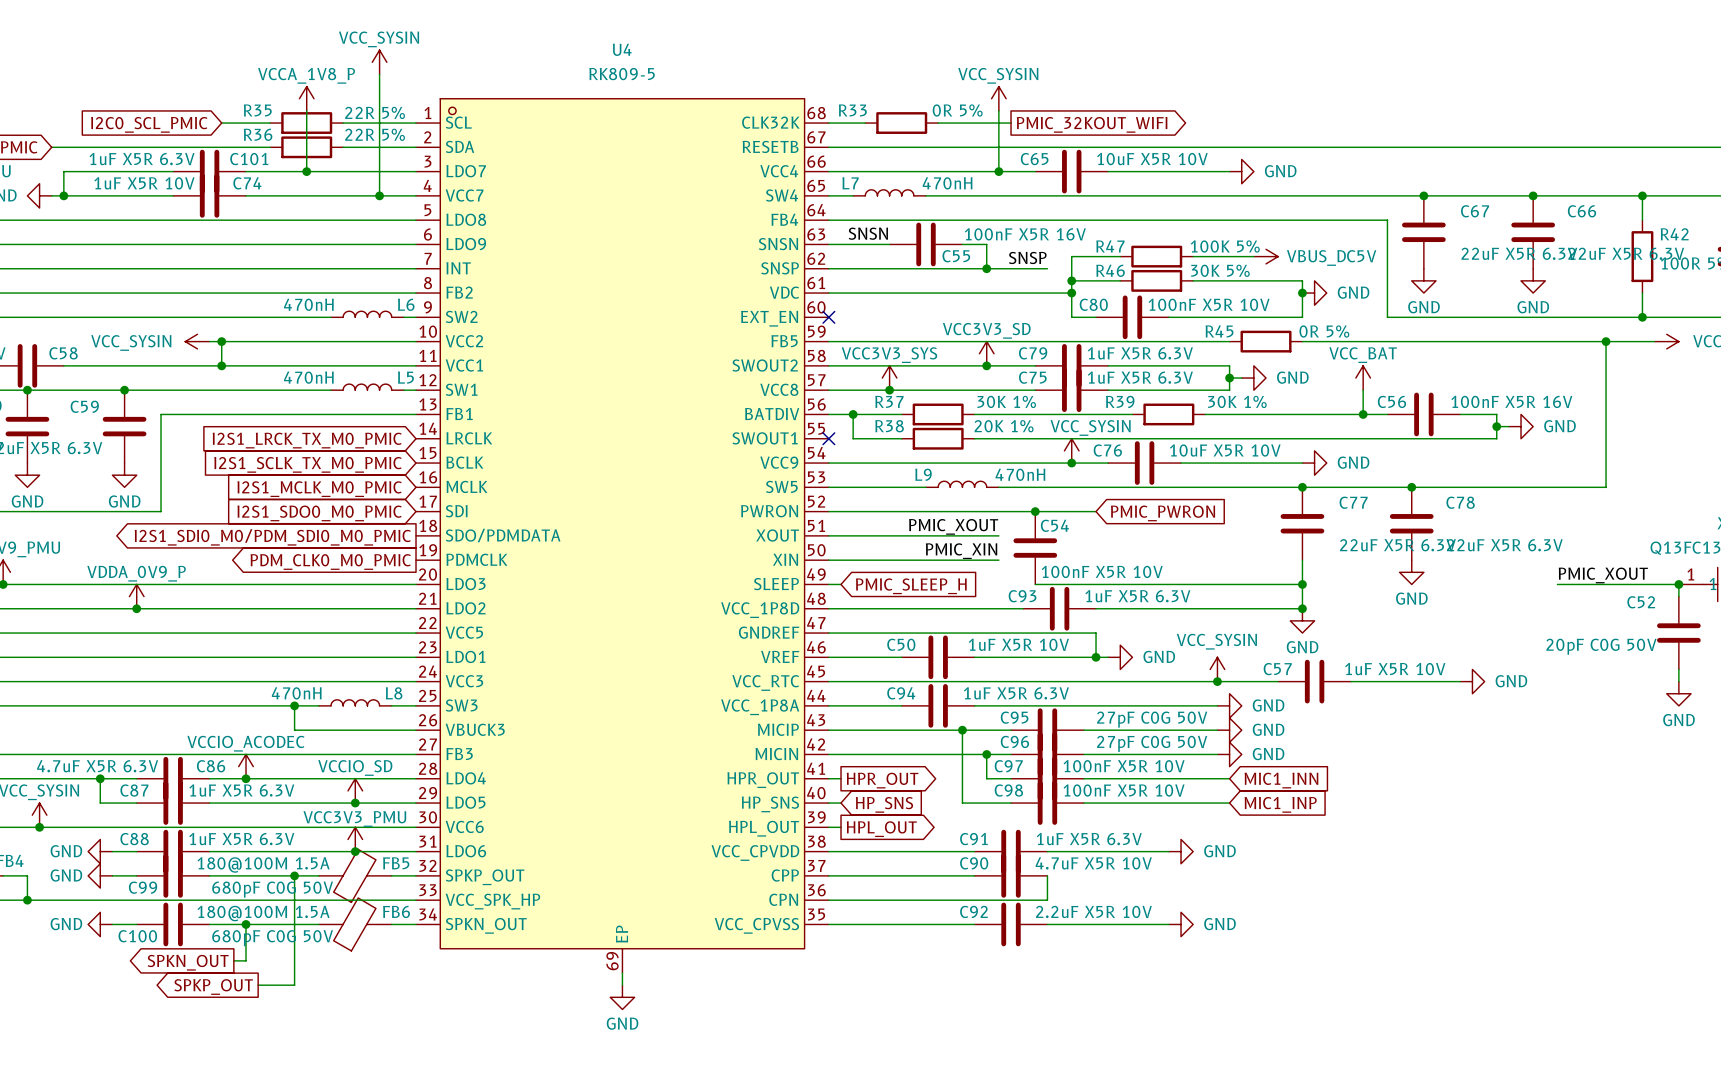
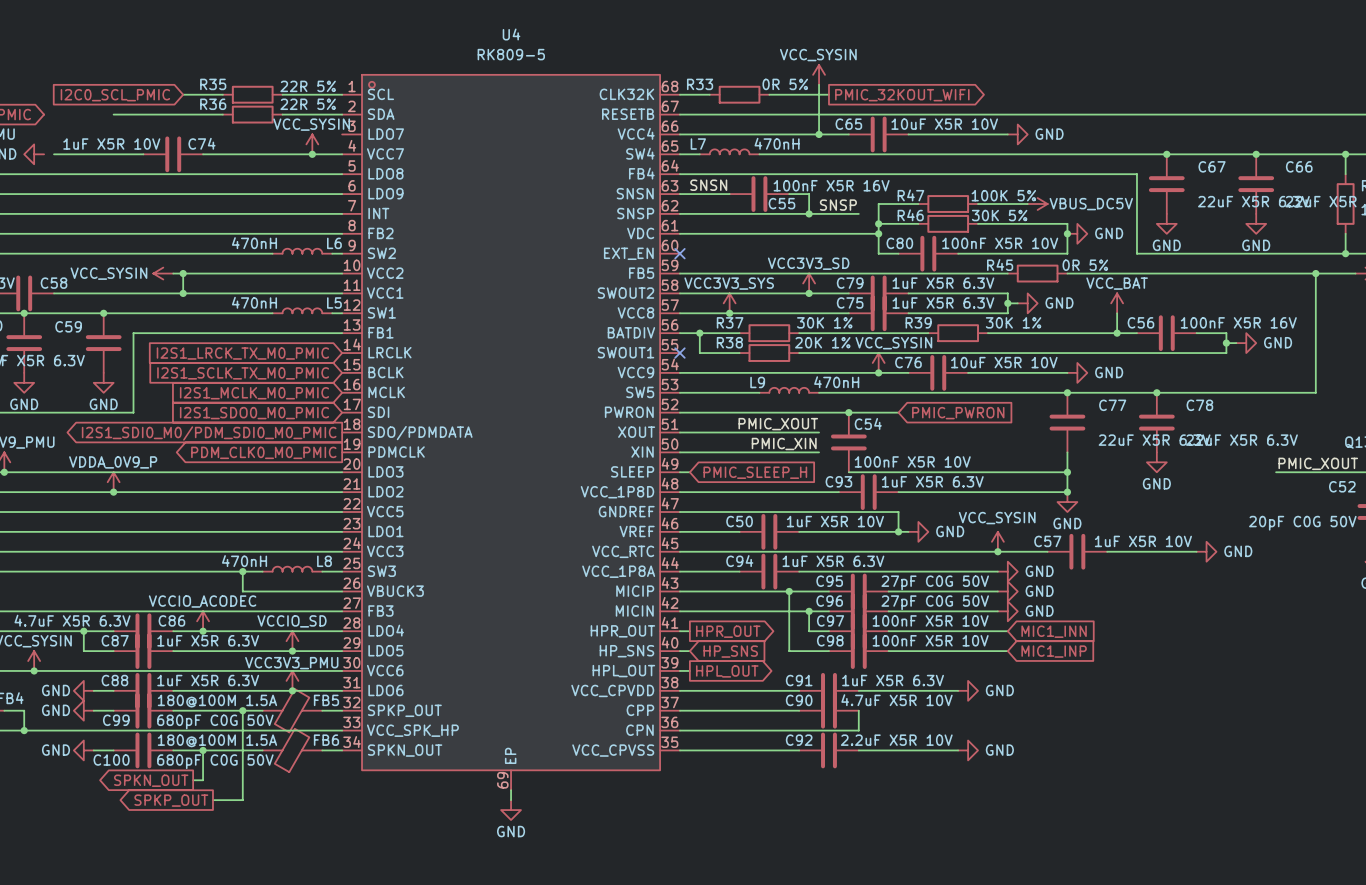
power symbol position: VCC_SYSIN (379, 62) -> VCC_SYSIN (312, 144)
wire: (379, 74) (379, 195) -> none
power symbol: VCCA_1V8_P (306, 98) -> none
wire: (306, 110) (306, 171) -> none
wire: (51, 147) (136, 147) -> none
wire: (173, 171) (63, 171) (63, 195) (51, 195) -> none
C101: 1uF X5R 6.3V (209, 171) -> none
wire: (246, 171) (416, 171) -> none
junction: (306, 171) -> none
junction: (63, 195) -> none

